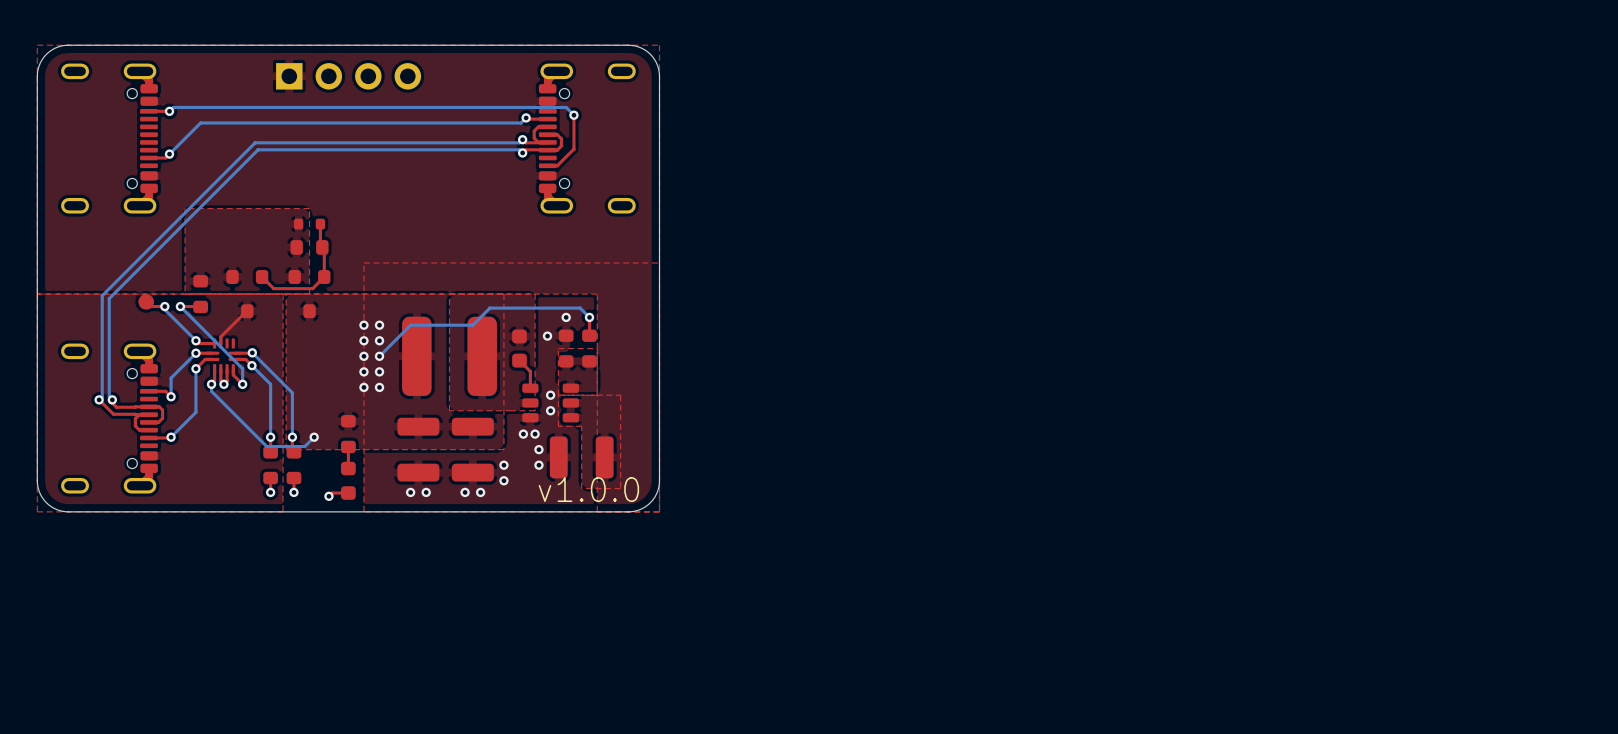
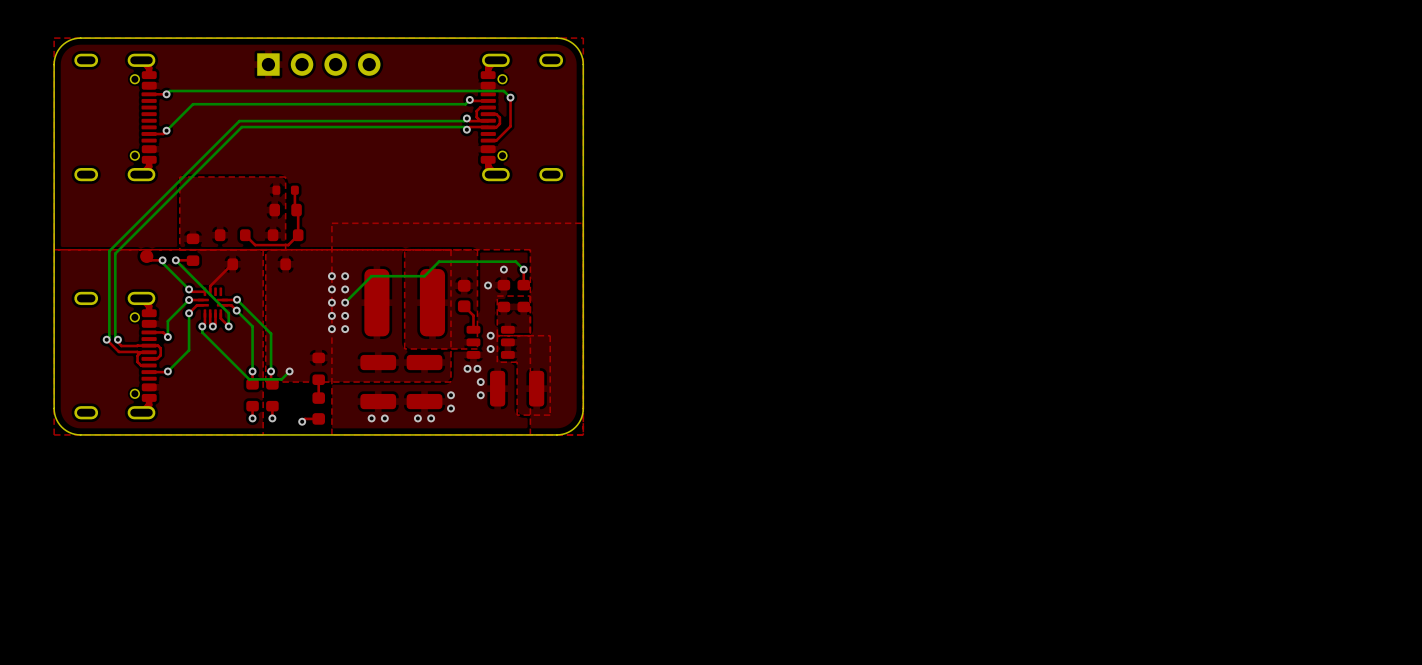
text: v1.0.0 (588, 489) -> none

